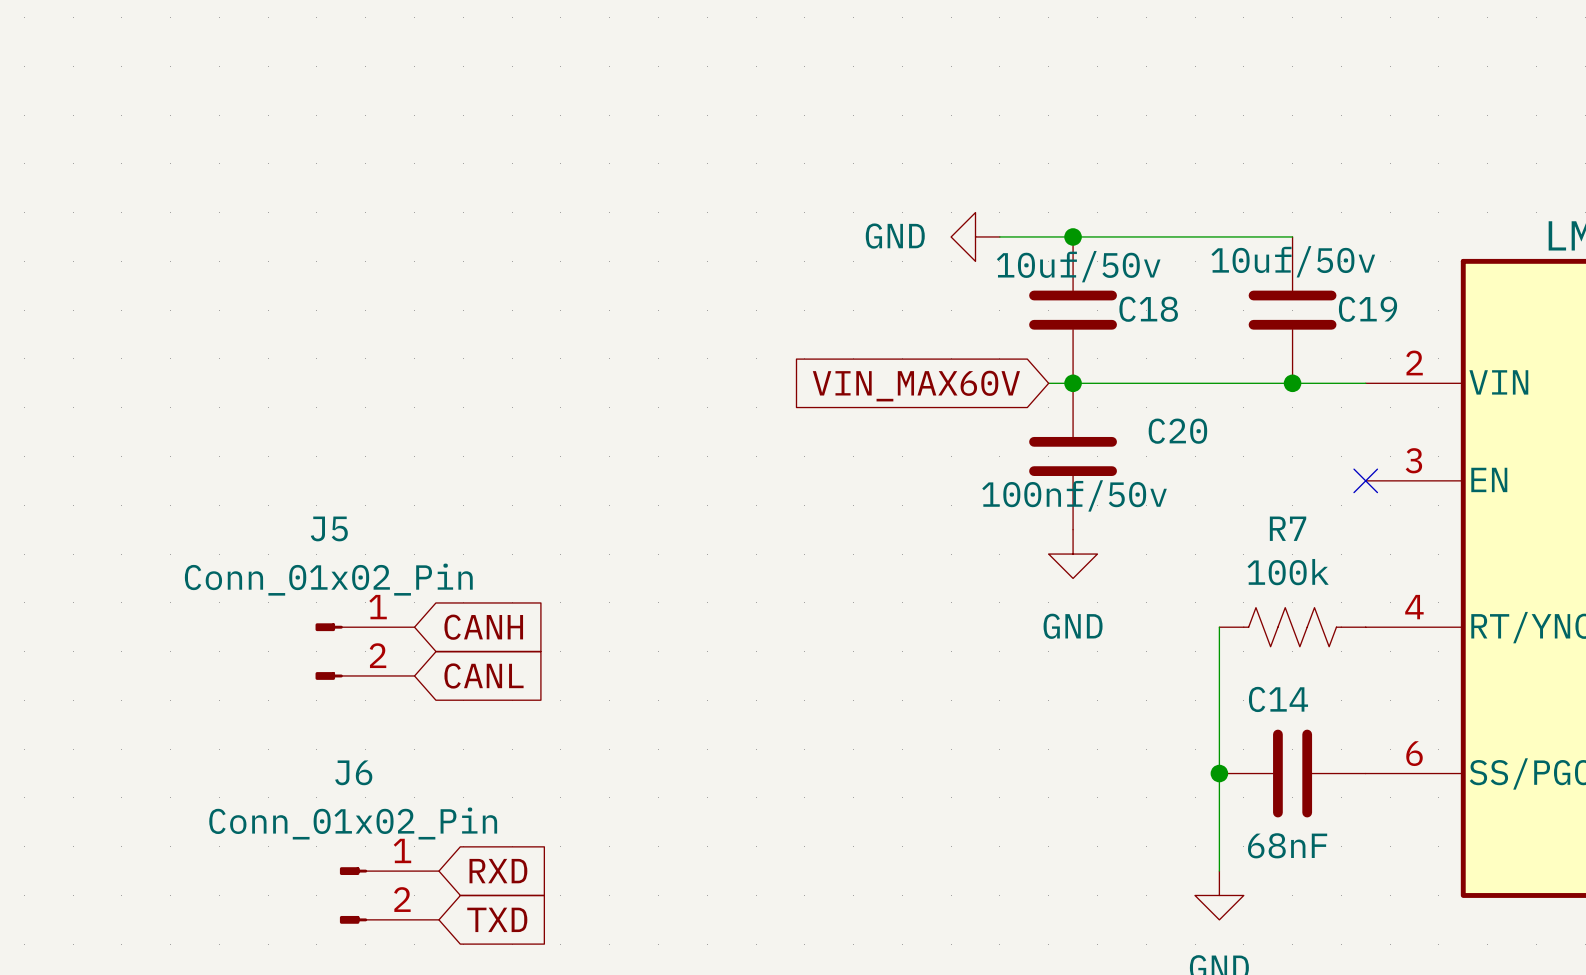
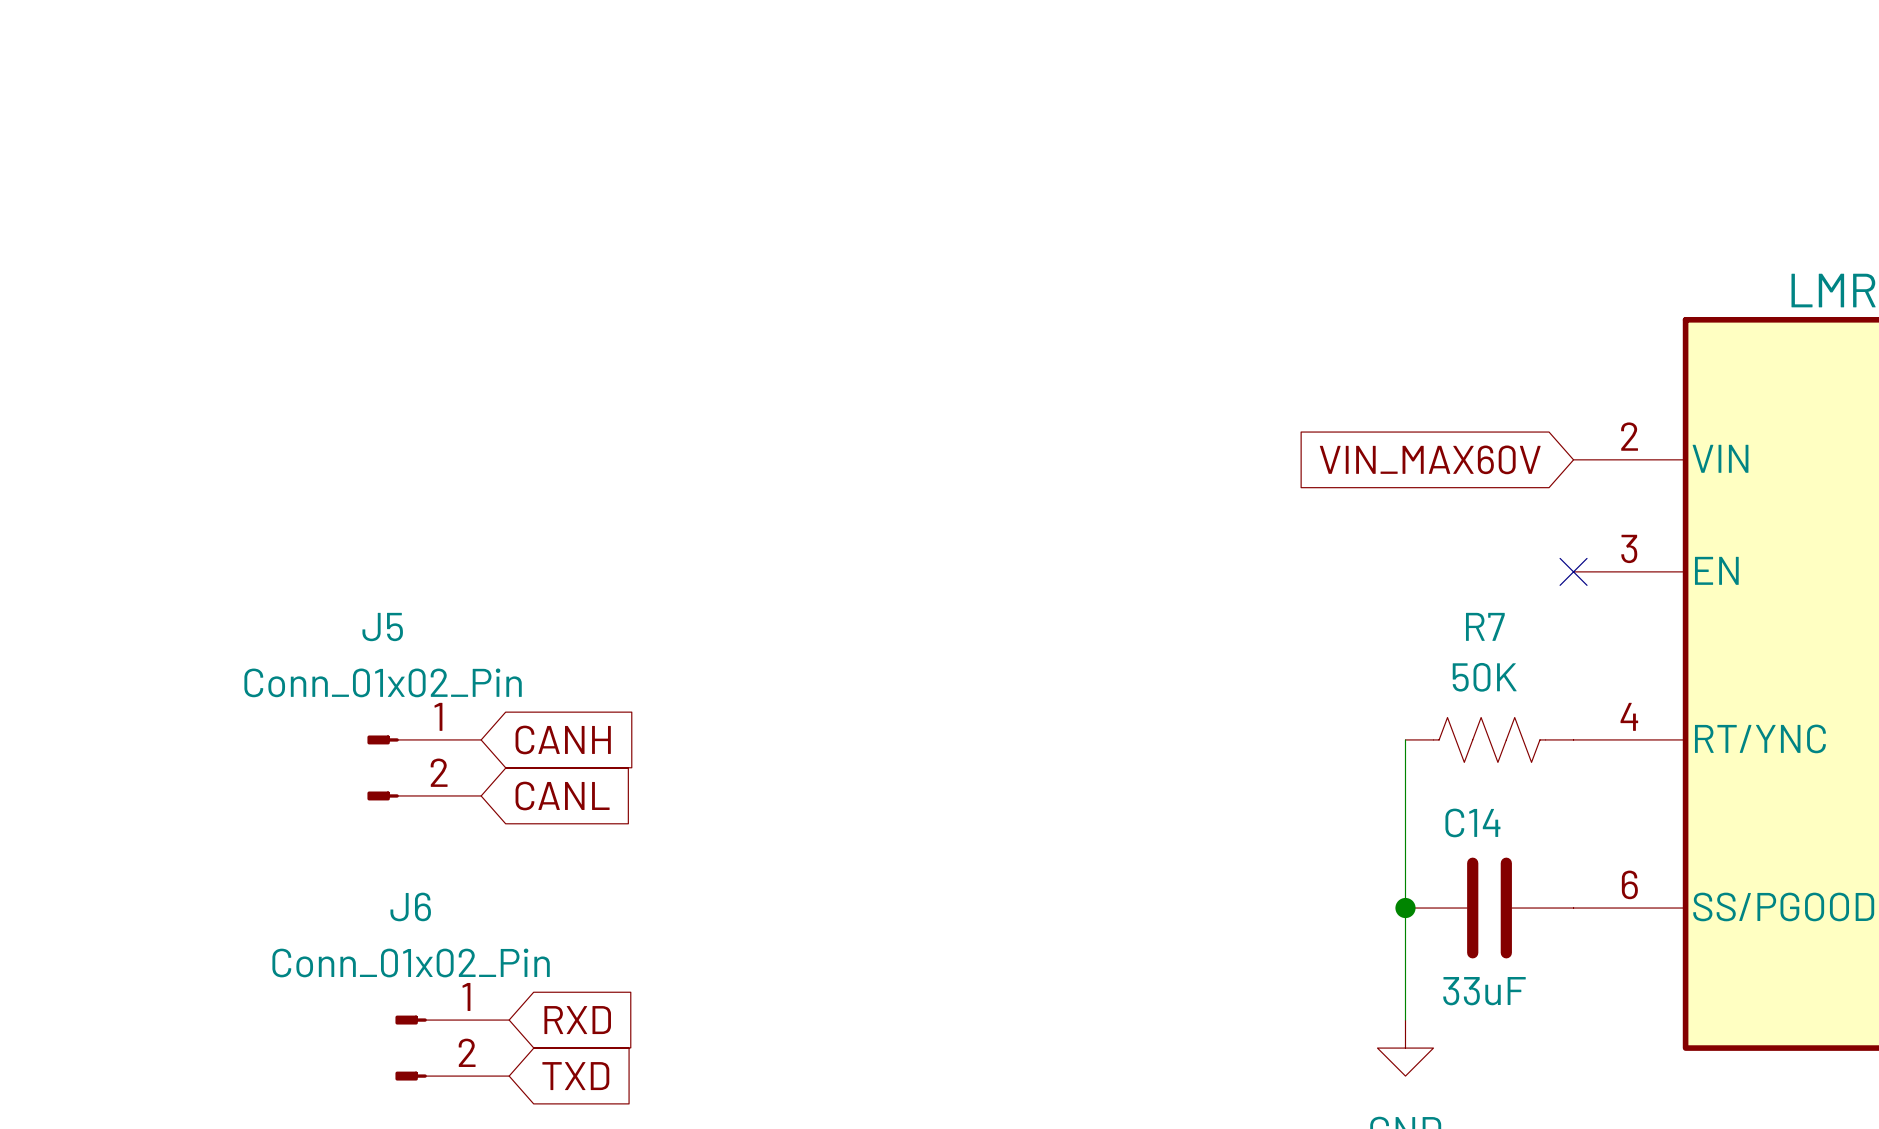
power symbol: GND (975, 236) -> none
wire: (999, 236) (1292, 236) -> none
junction: (1073, 236) -> none
C18: 10uf/50v (1073, 310) -> none
C19: 10uf/50v (1292, 310) -> none
wire: (1048, 383) (1365, 383) -> none
junction: (1073, 383) -> none
junction: (1292, 383) -> none
global label position: VIN_MAX60V (916, 386) -> VIN_MAX60V (1430, 459)
C20: 100nf/50v (1073, 456) -> none
power symbol: GND (1073, 554) -> none
R7 value: 100k (1288, 572) -> 50K (1484, 677)
C14 value: 68nF (1287, 845) -> 33uF (1484, 991)

